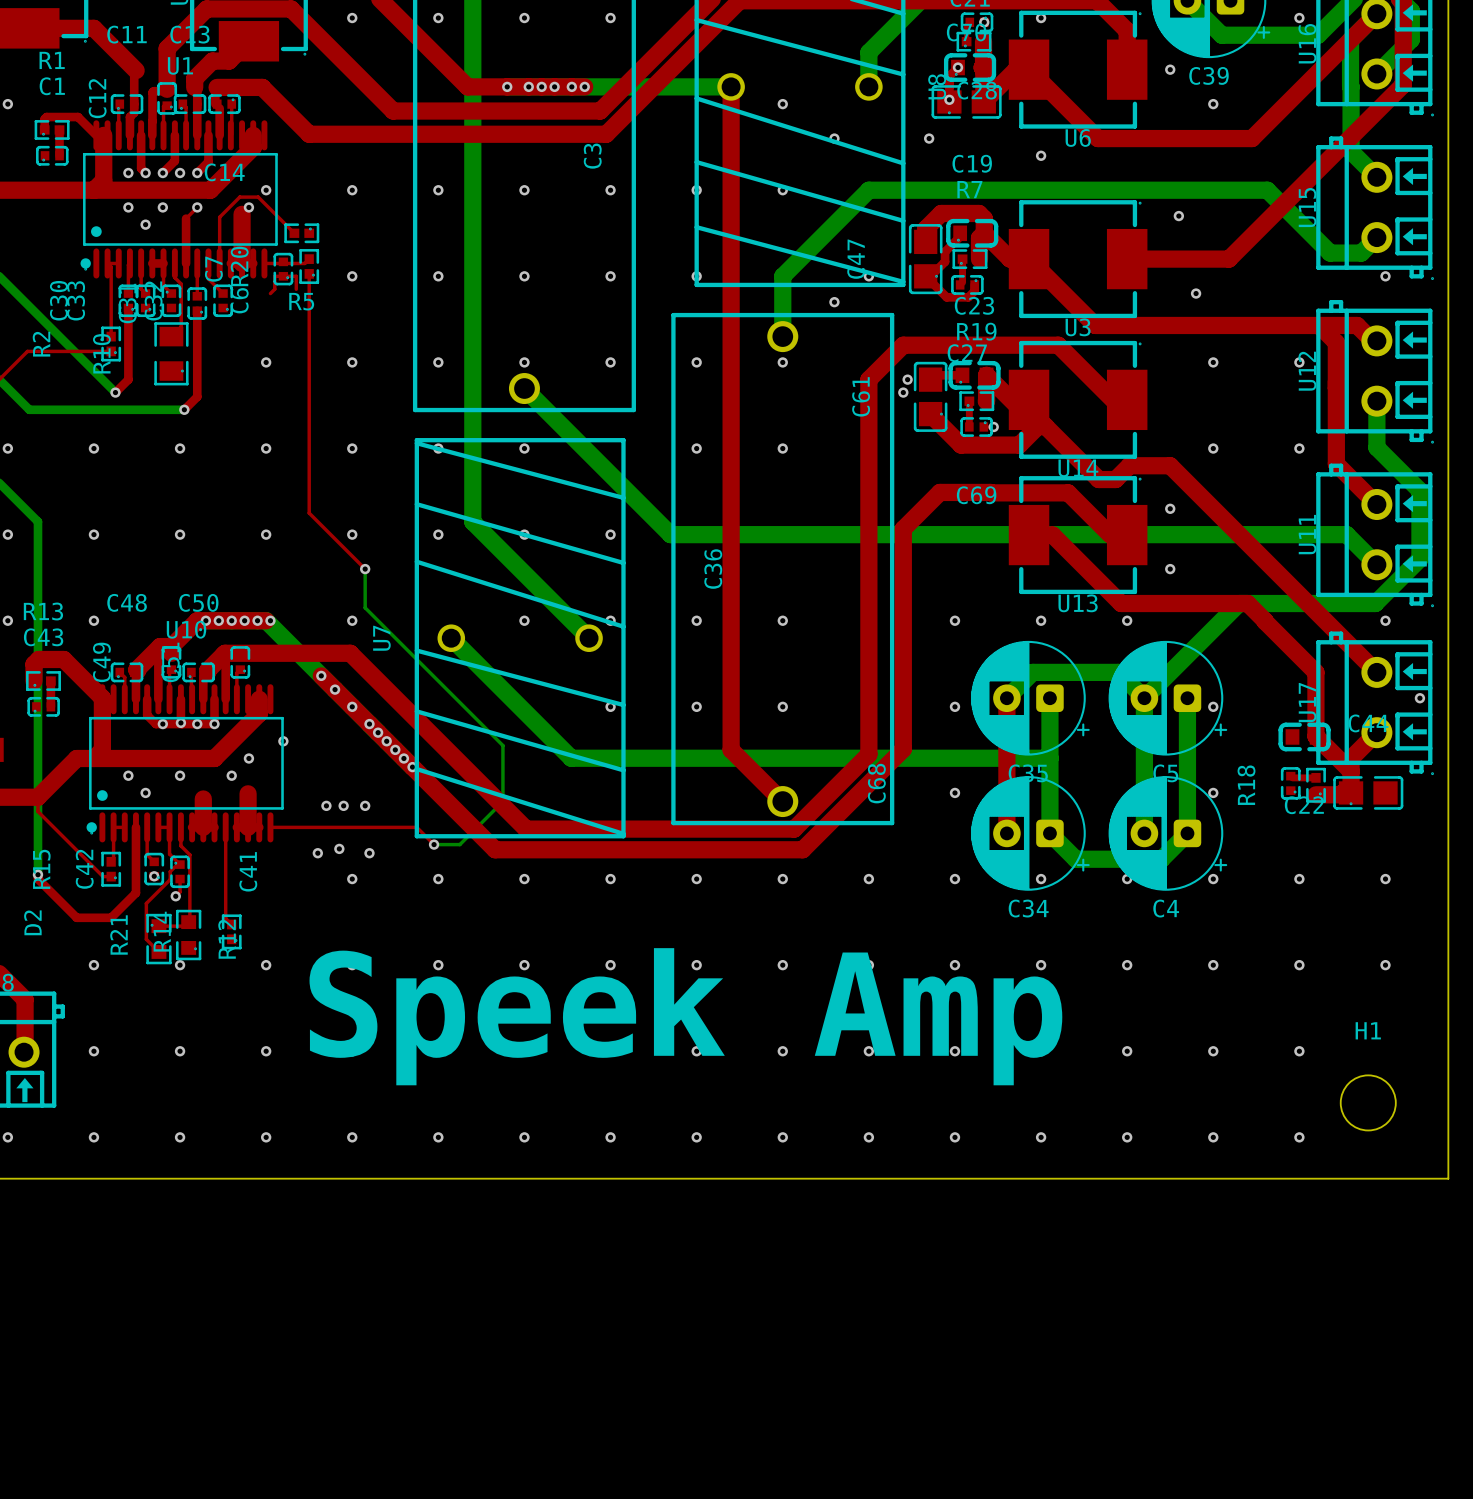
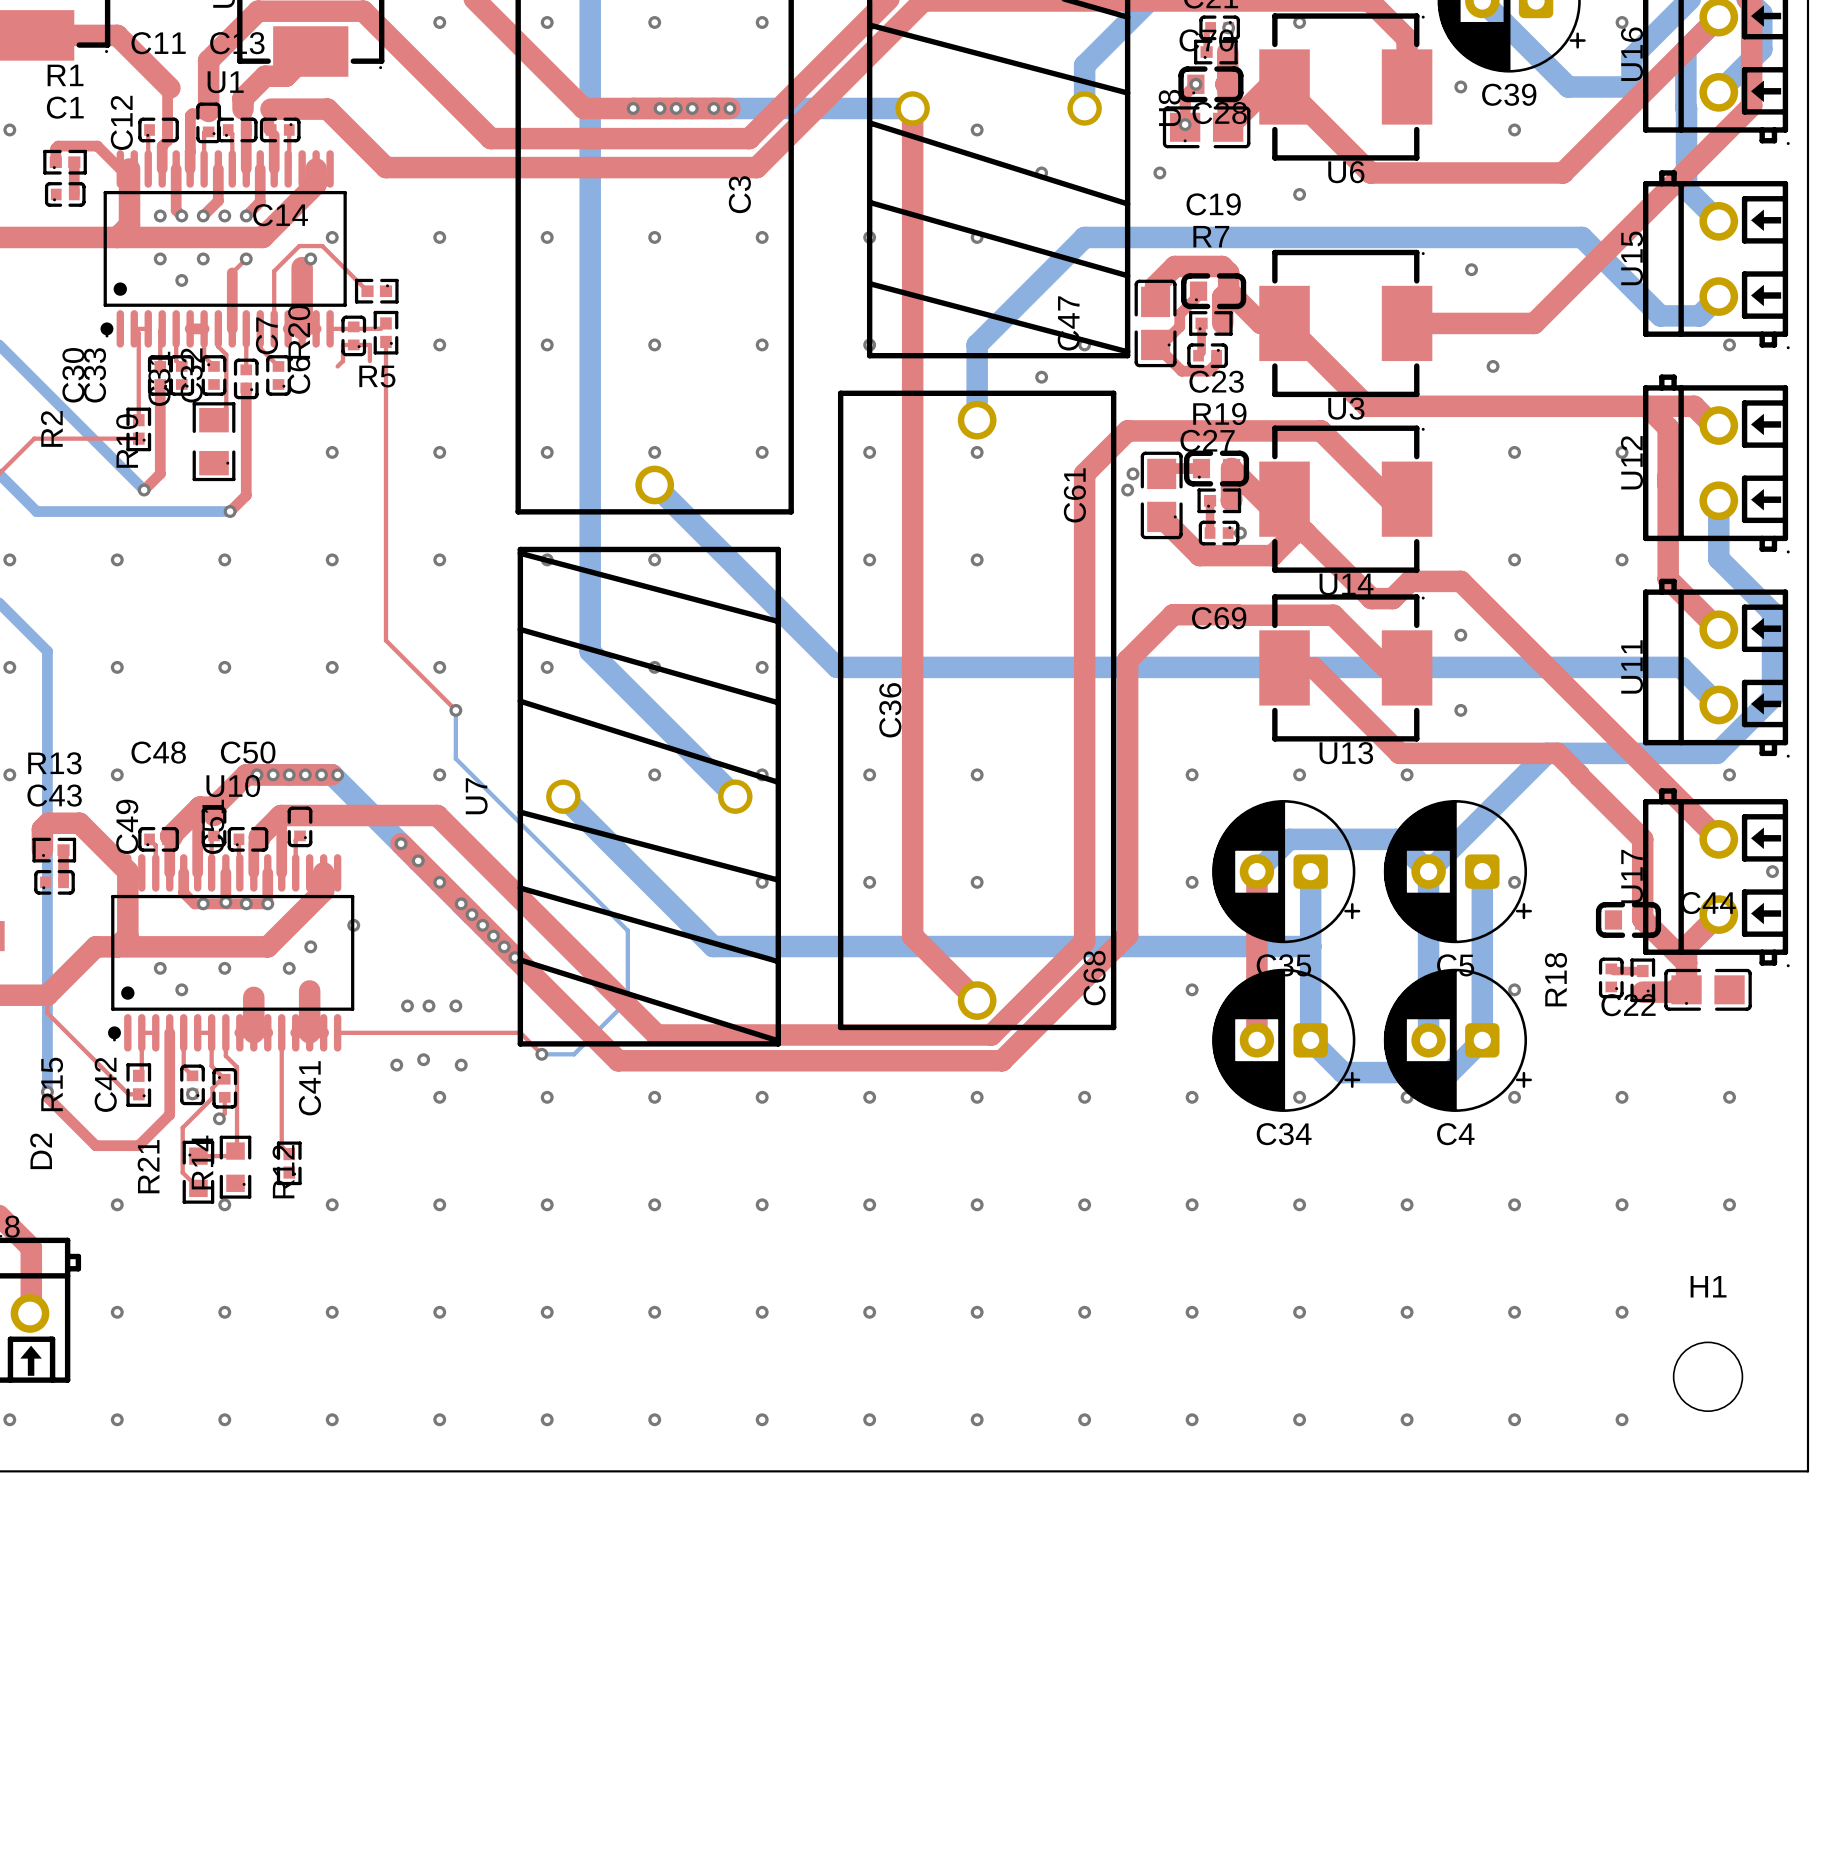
bottom track: (1221, 35) (1318, 35) -> (1525, 43) (1568, 86) (1631, 86) (1631, 57) (1645, 43)
text: Speek Amp (685, 1016) -> none

